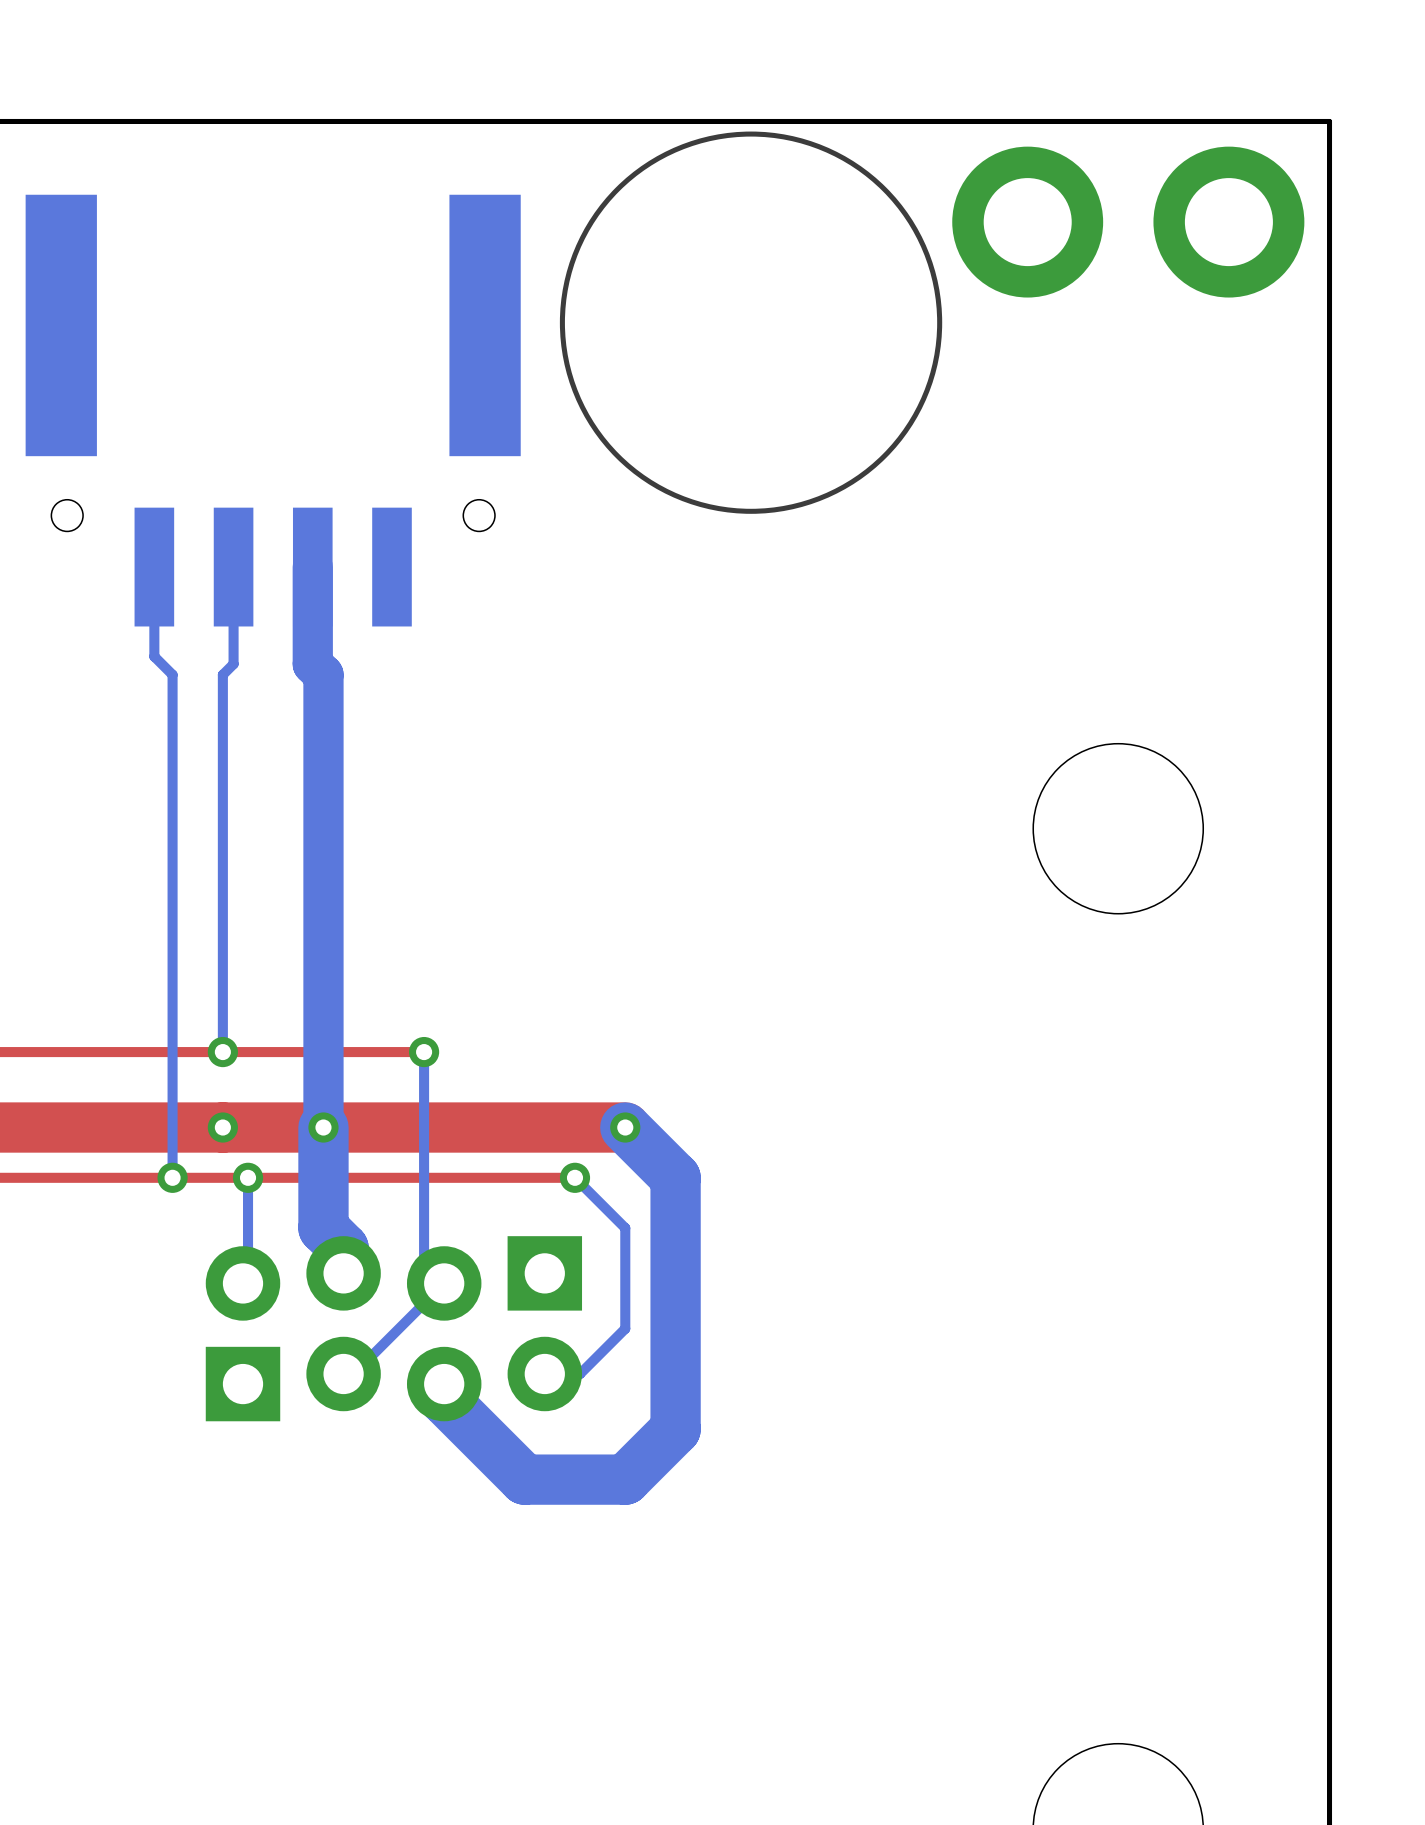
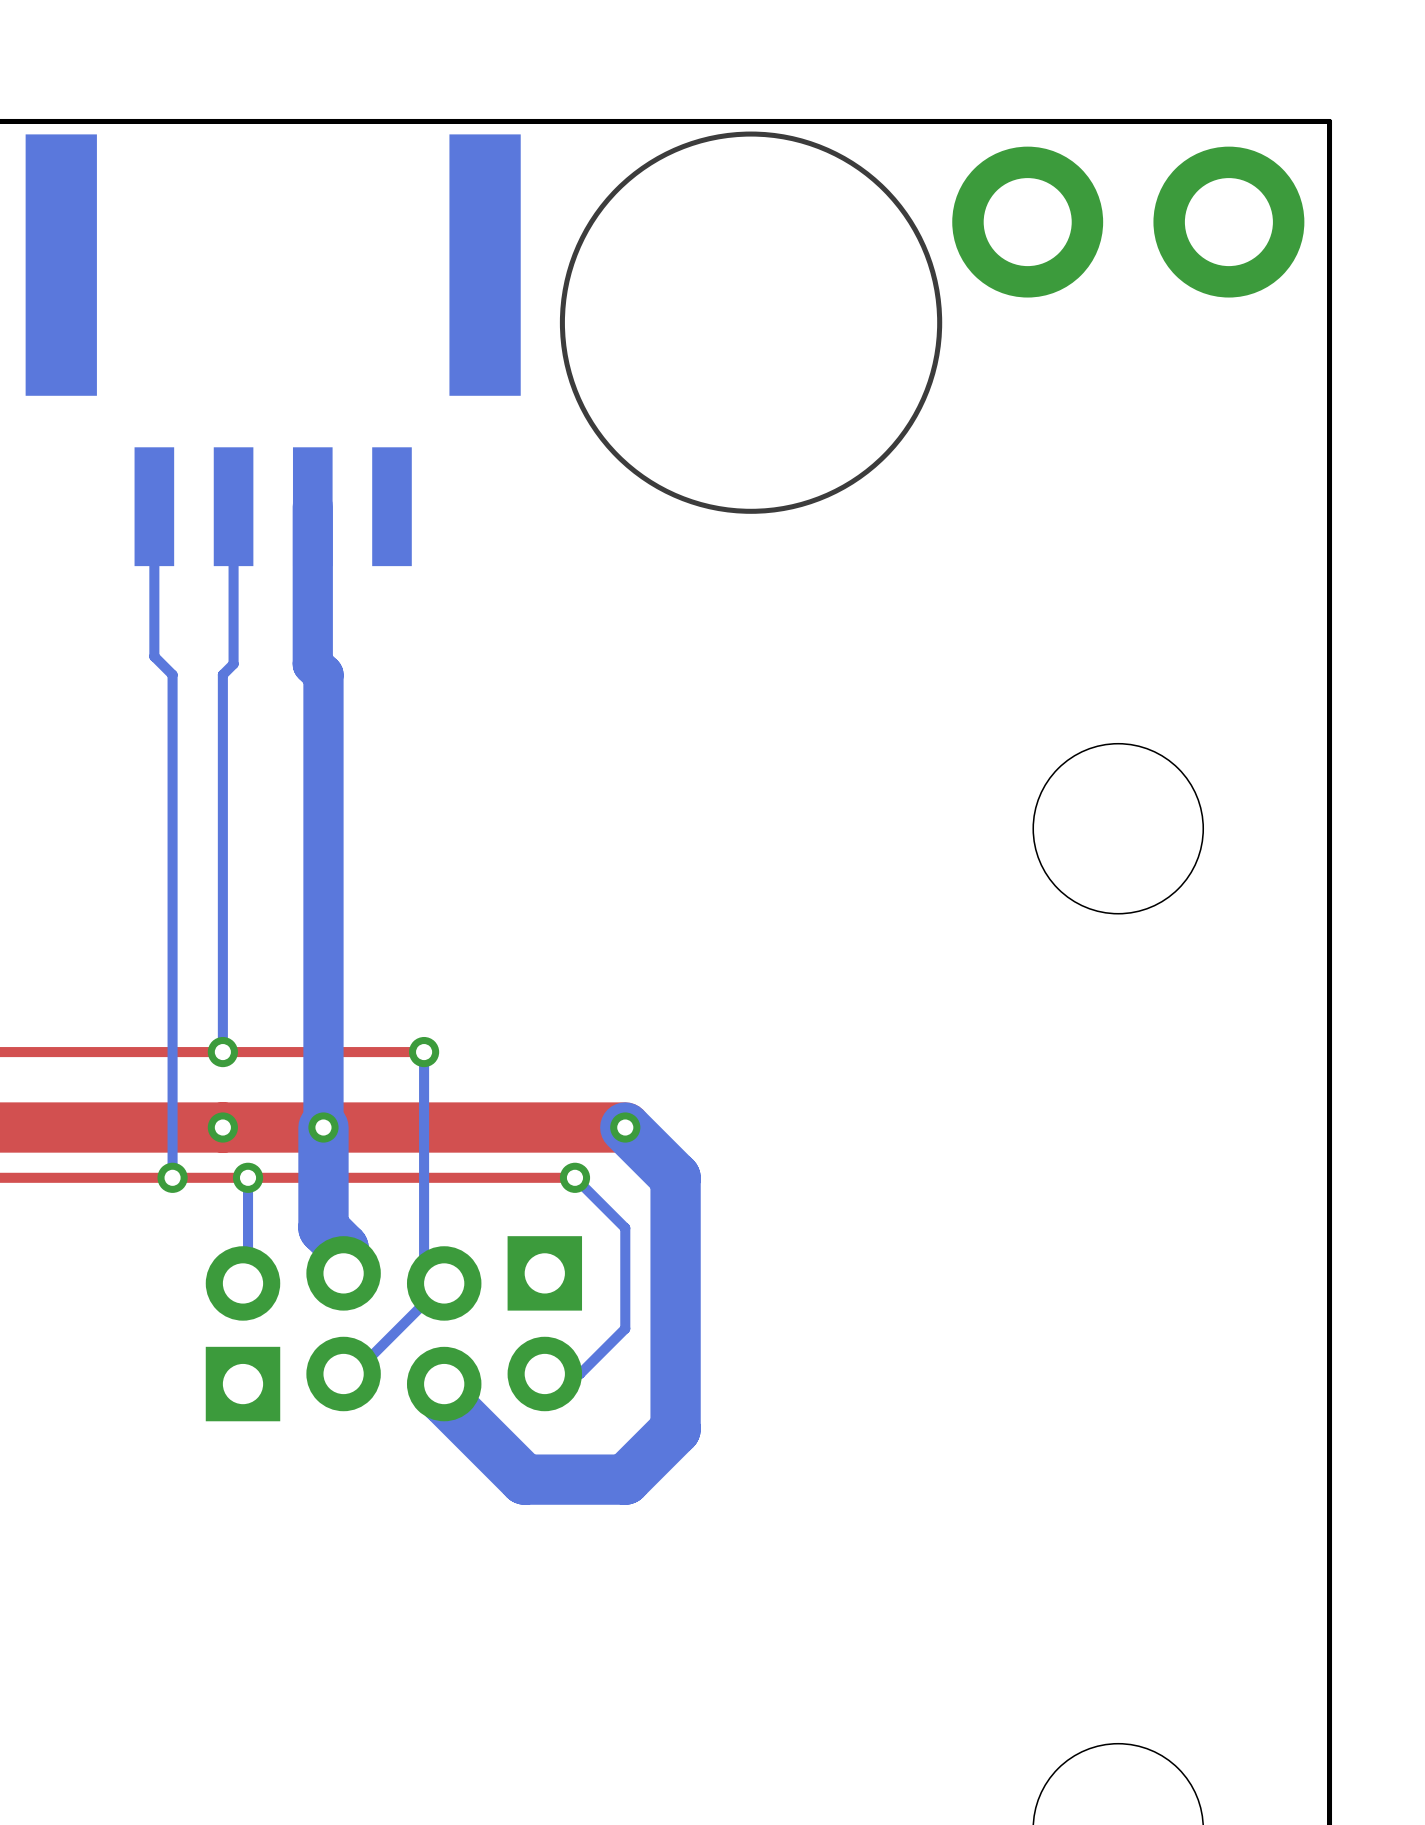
part: none -> (273, 350)
part: (273, 410) -> none

